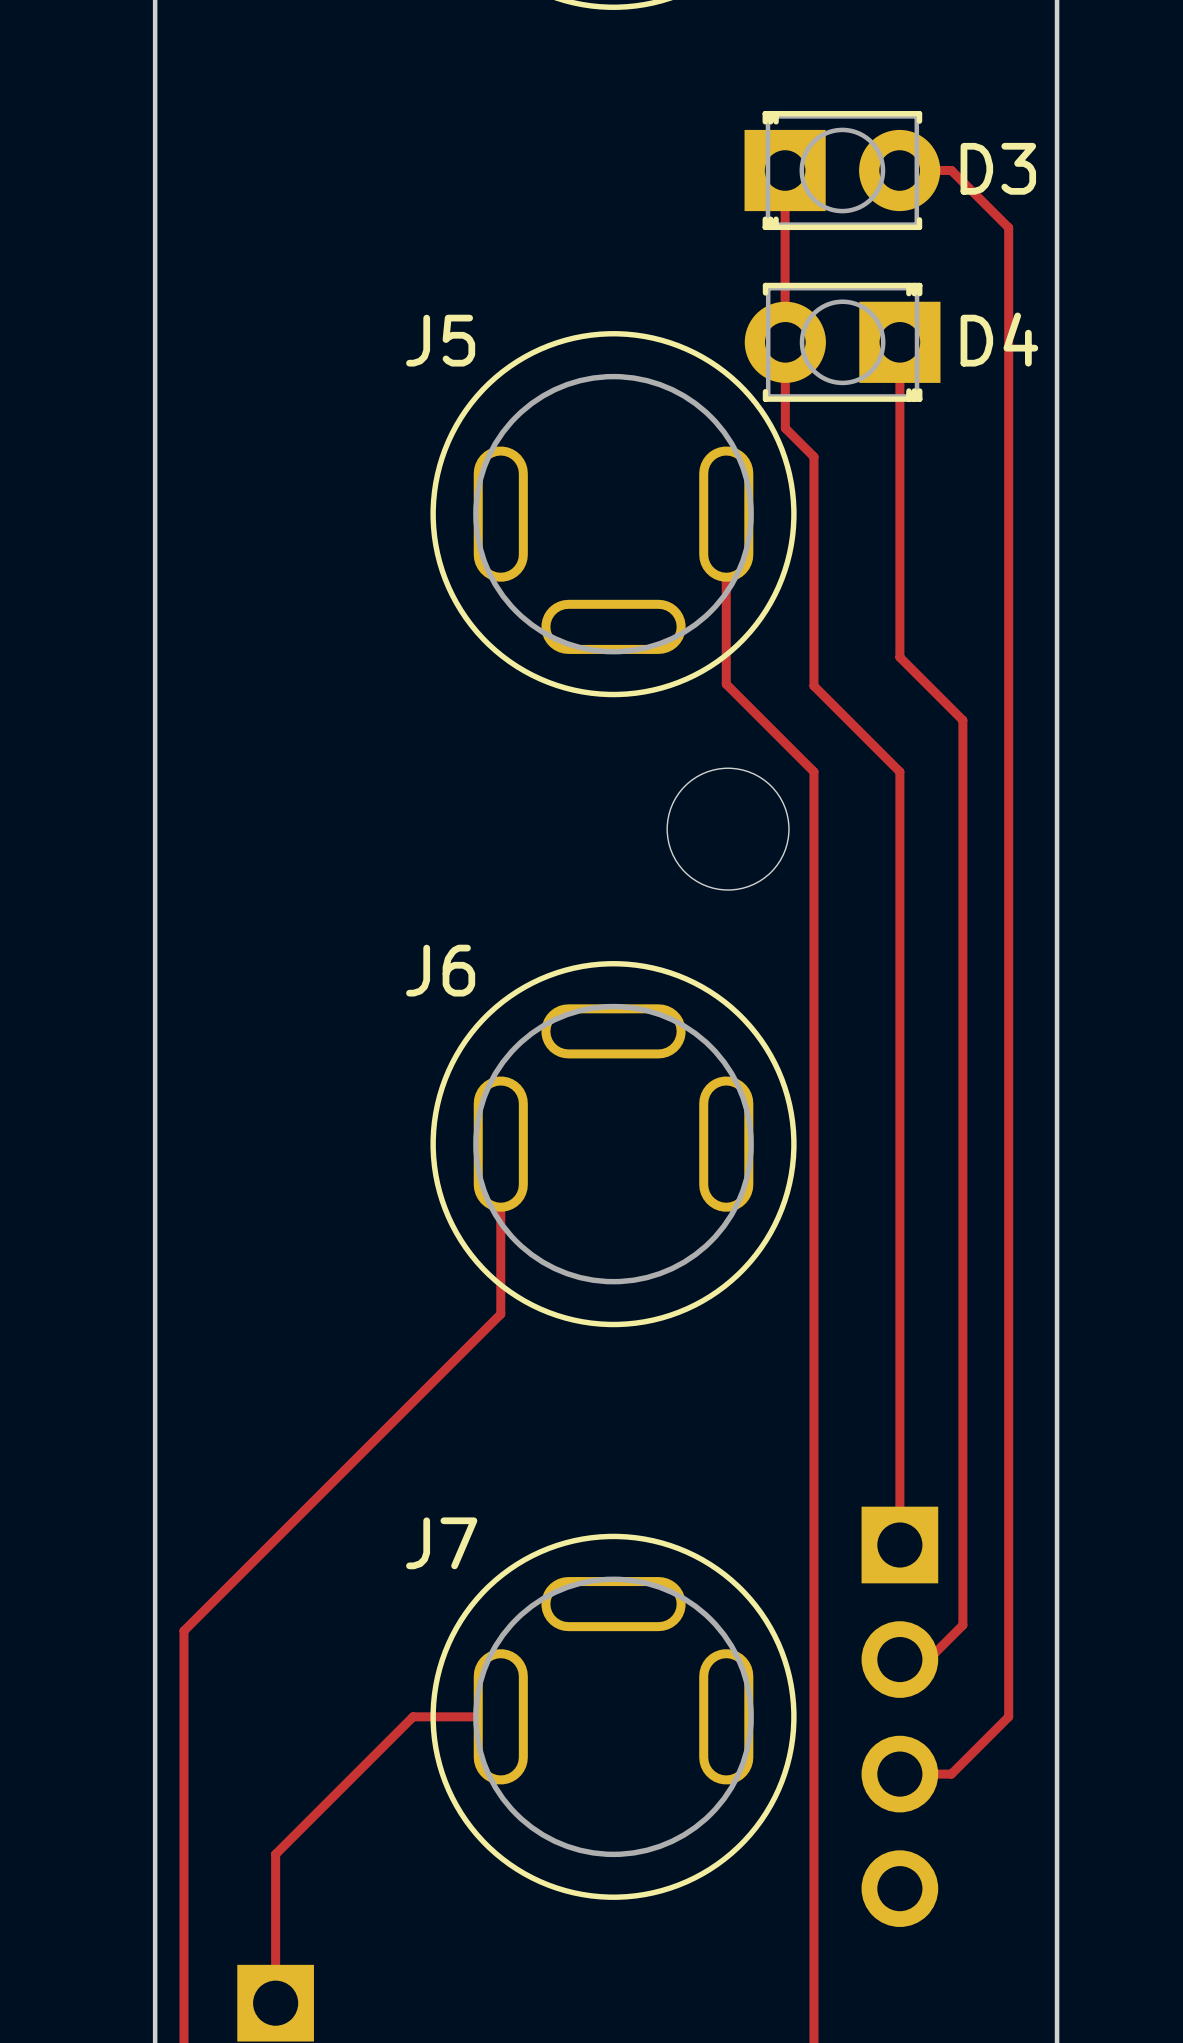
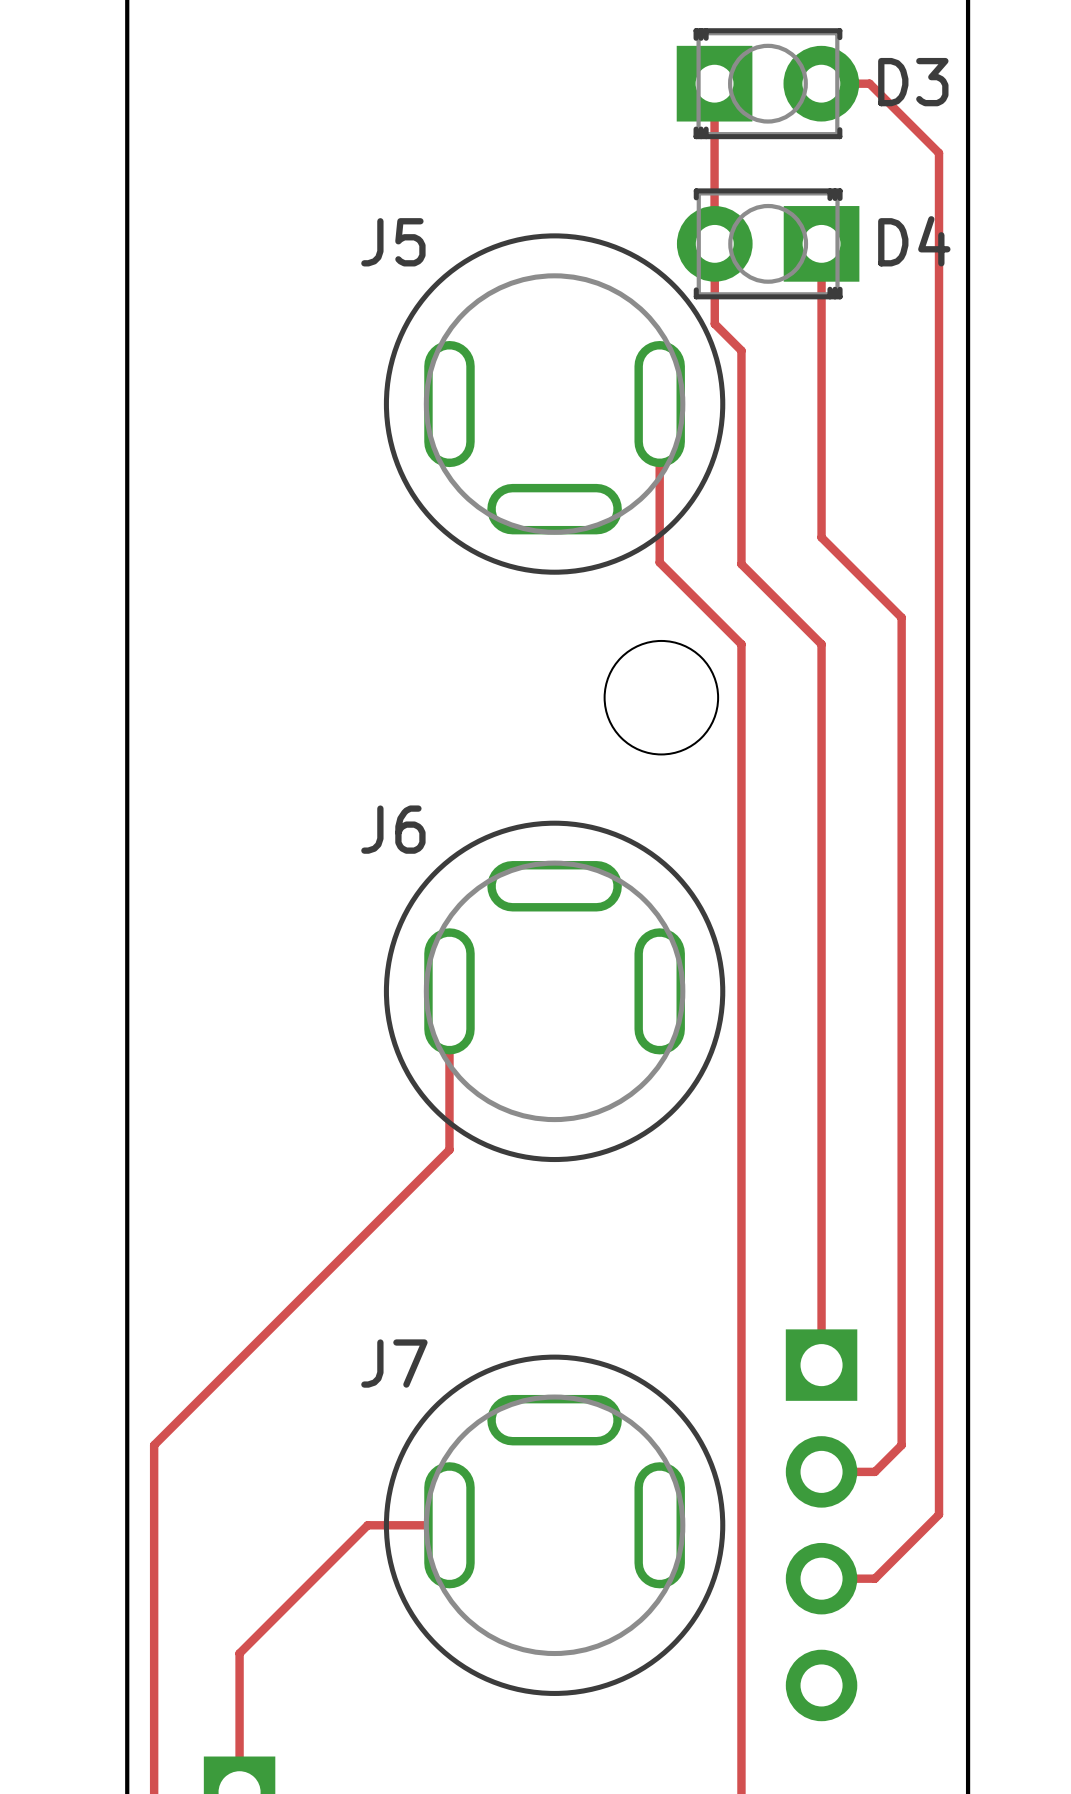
track: (1008, 227) (1008, 1716) (951, 1774) -> (922, 137) (939, 153) (939, 1514) (874, 1578) (869, 1578)
track: (962, 720) (962, 1625) (928, 1659) -> (880, 596) (901, 617) (901, 1445) (874, 1471) (848, 1471)

